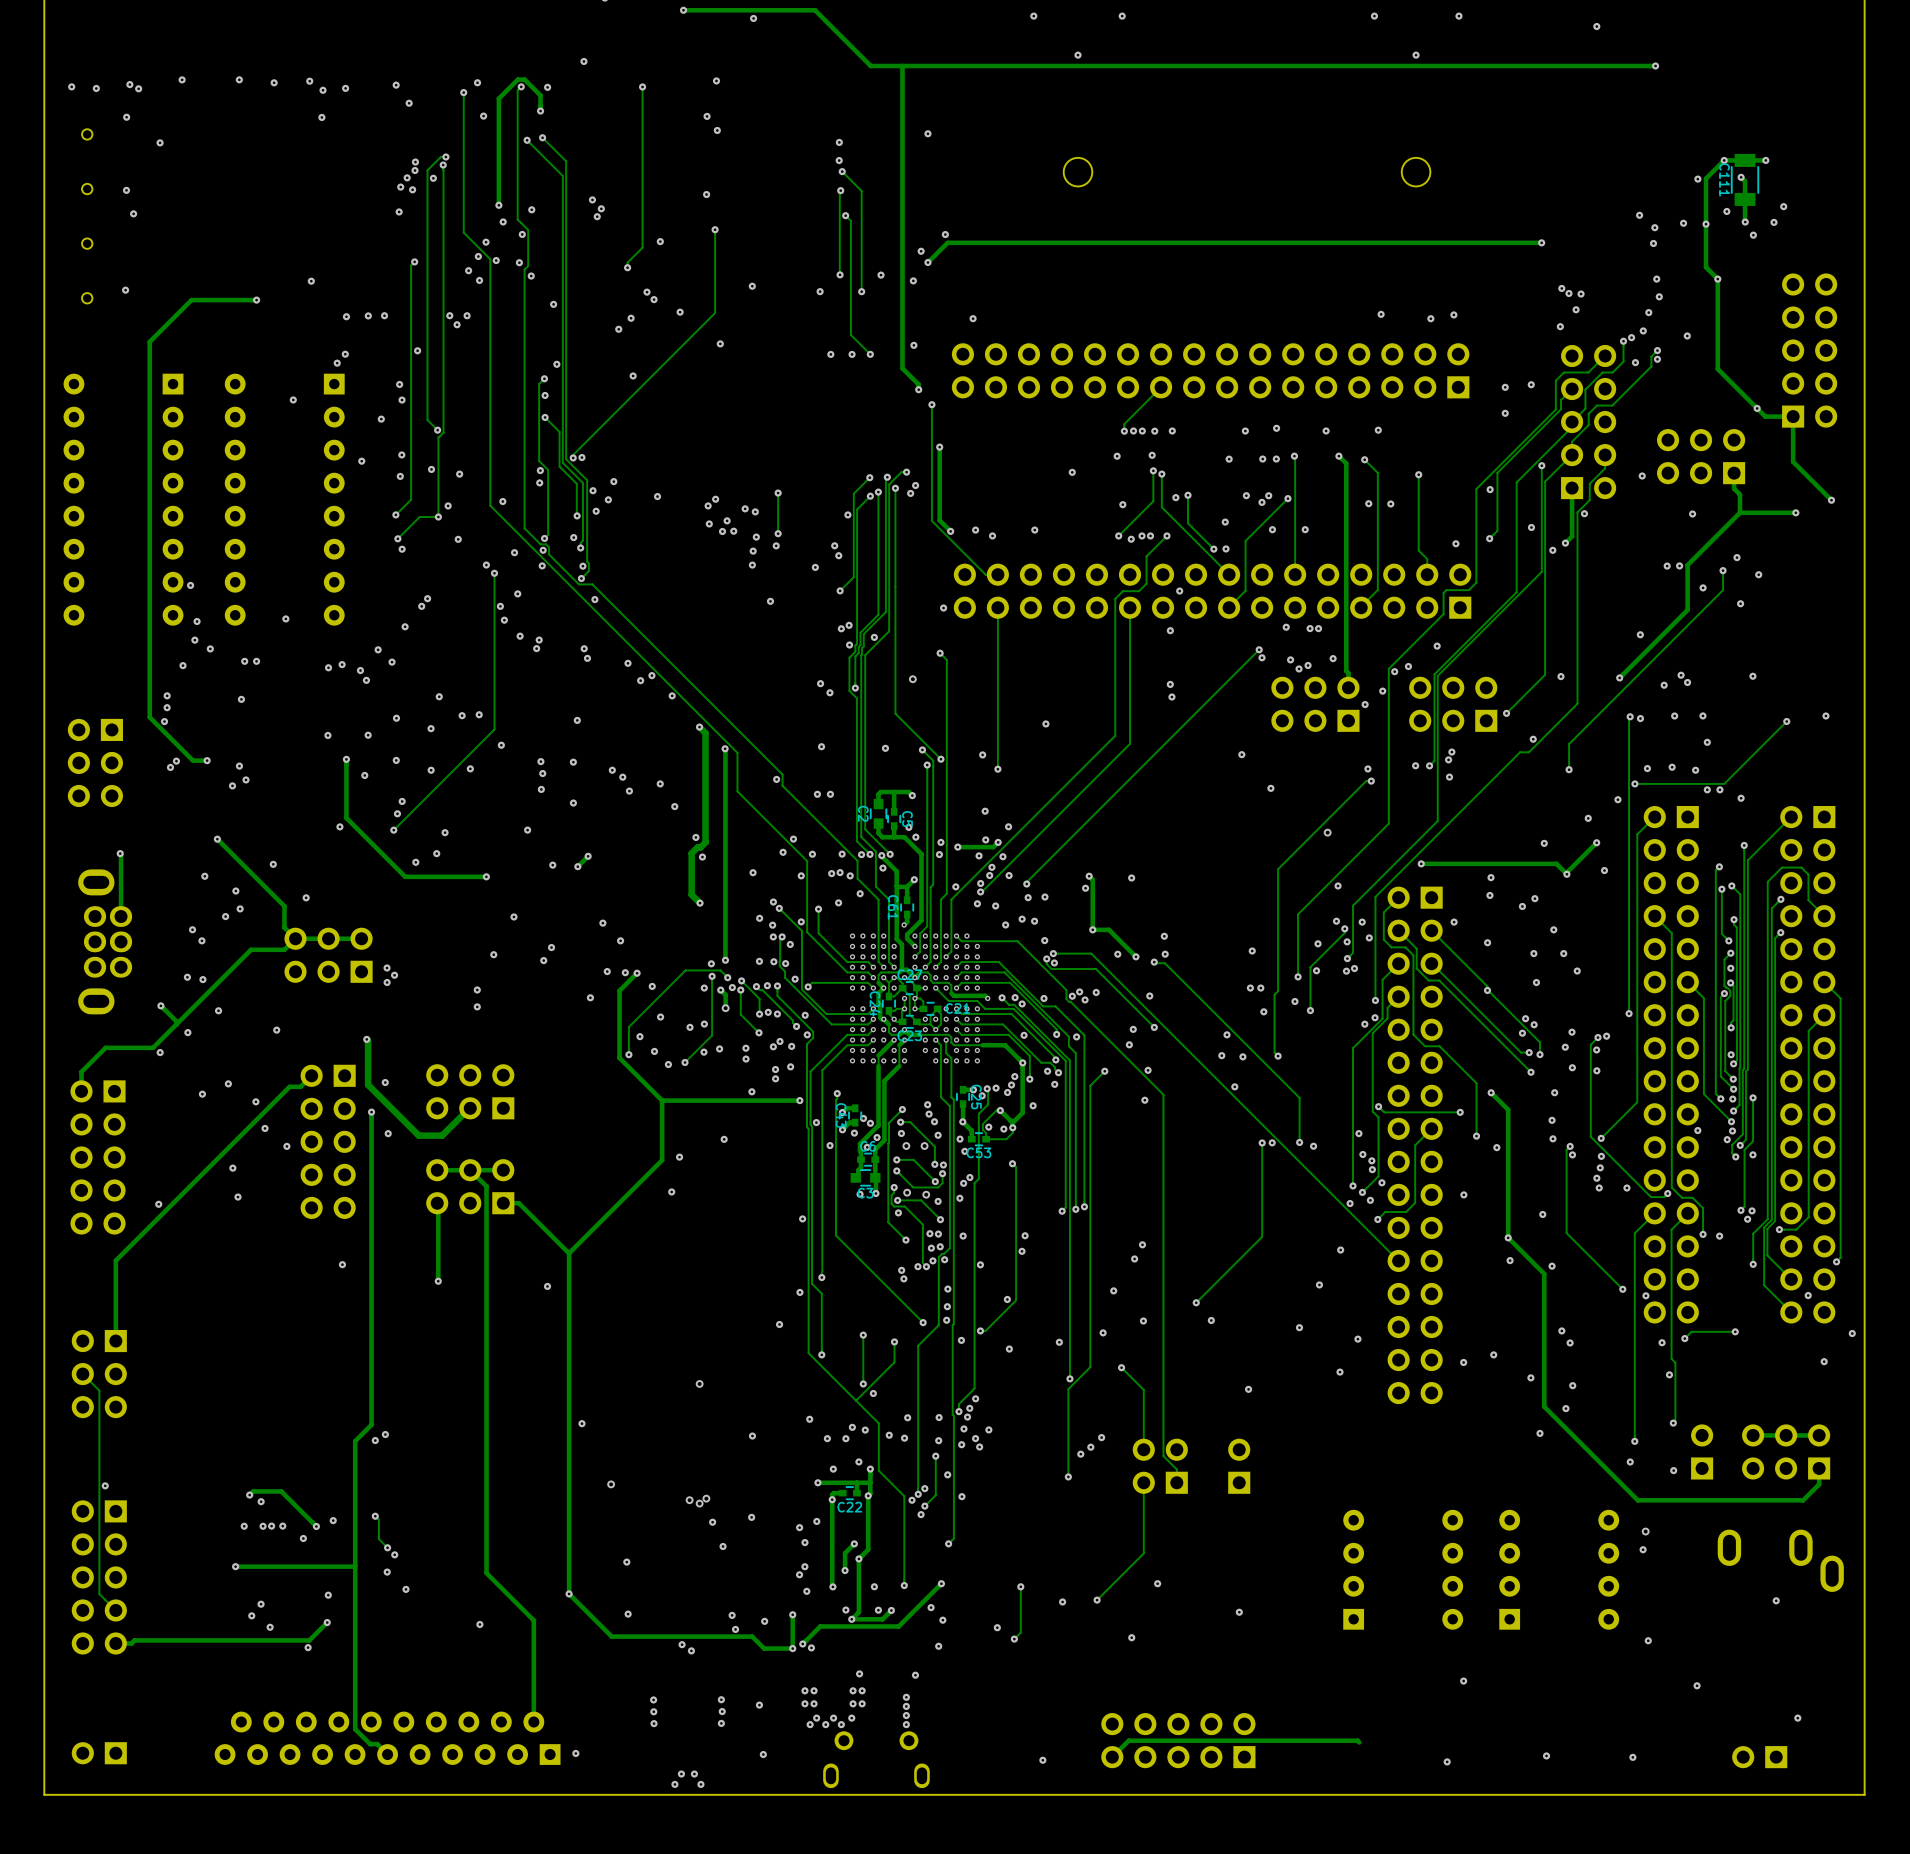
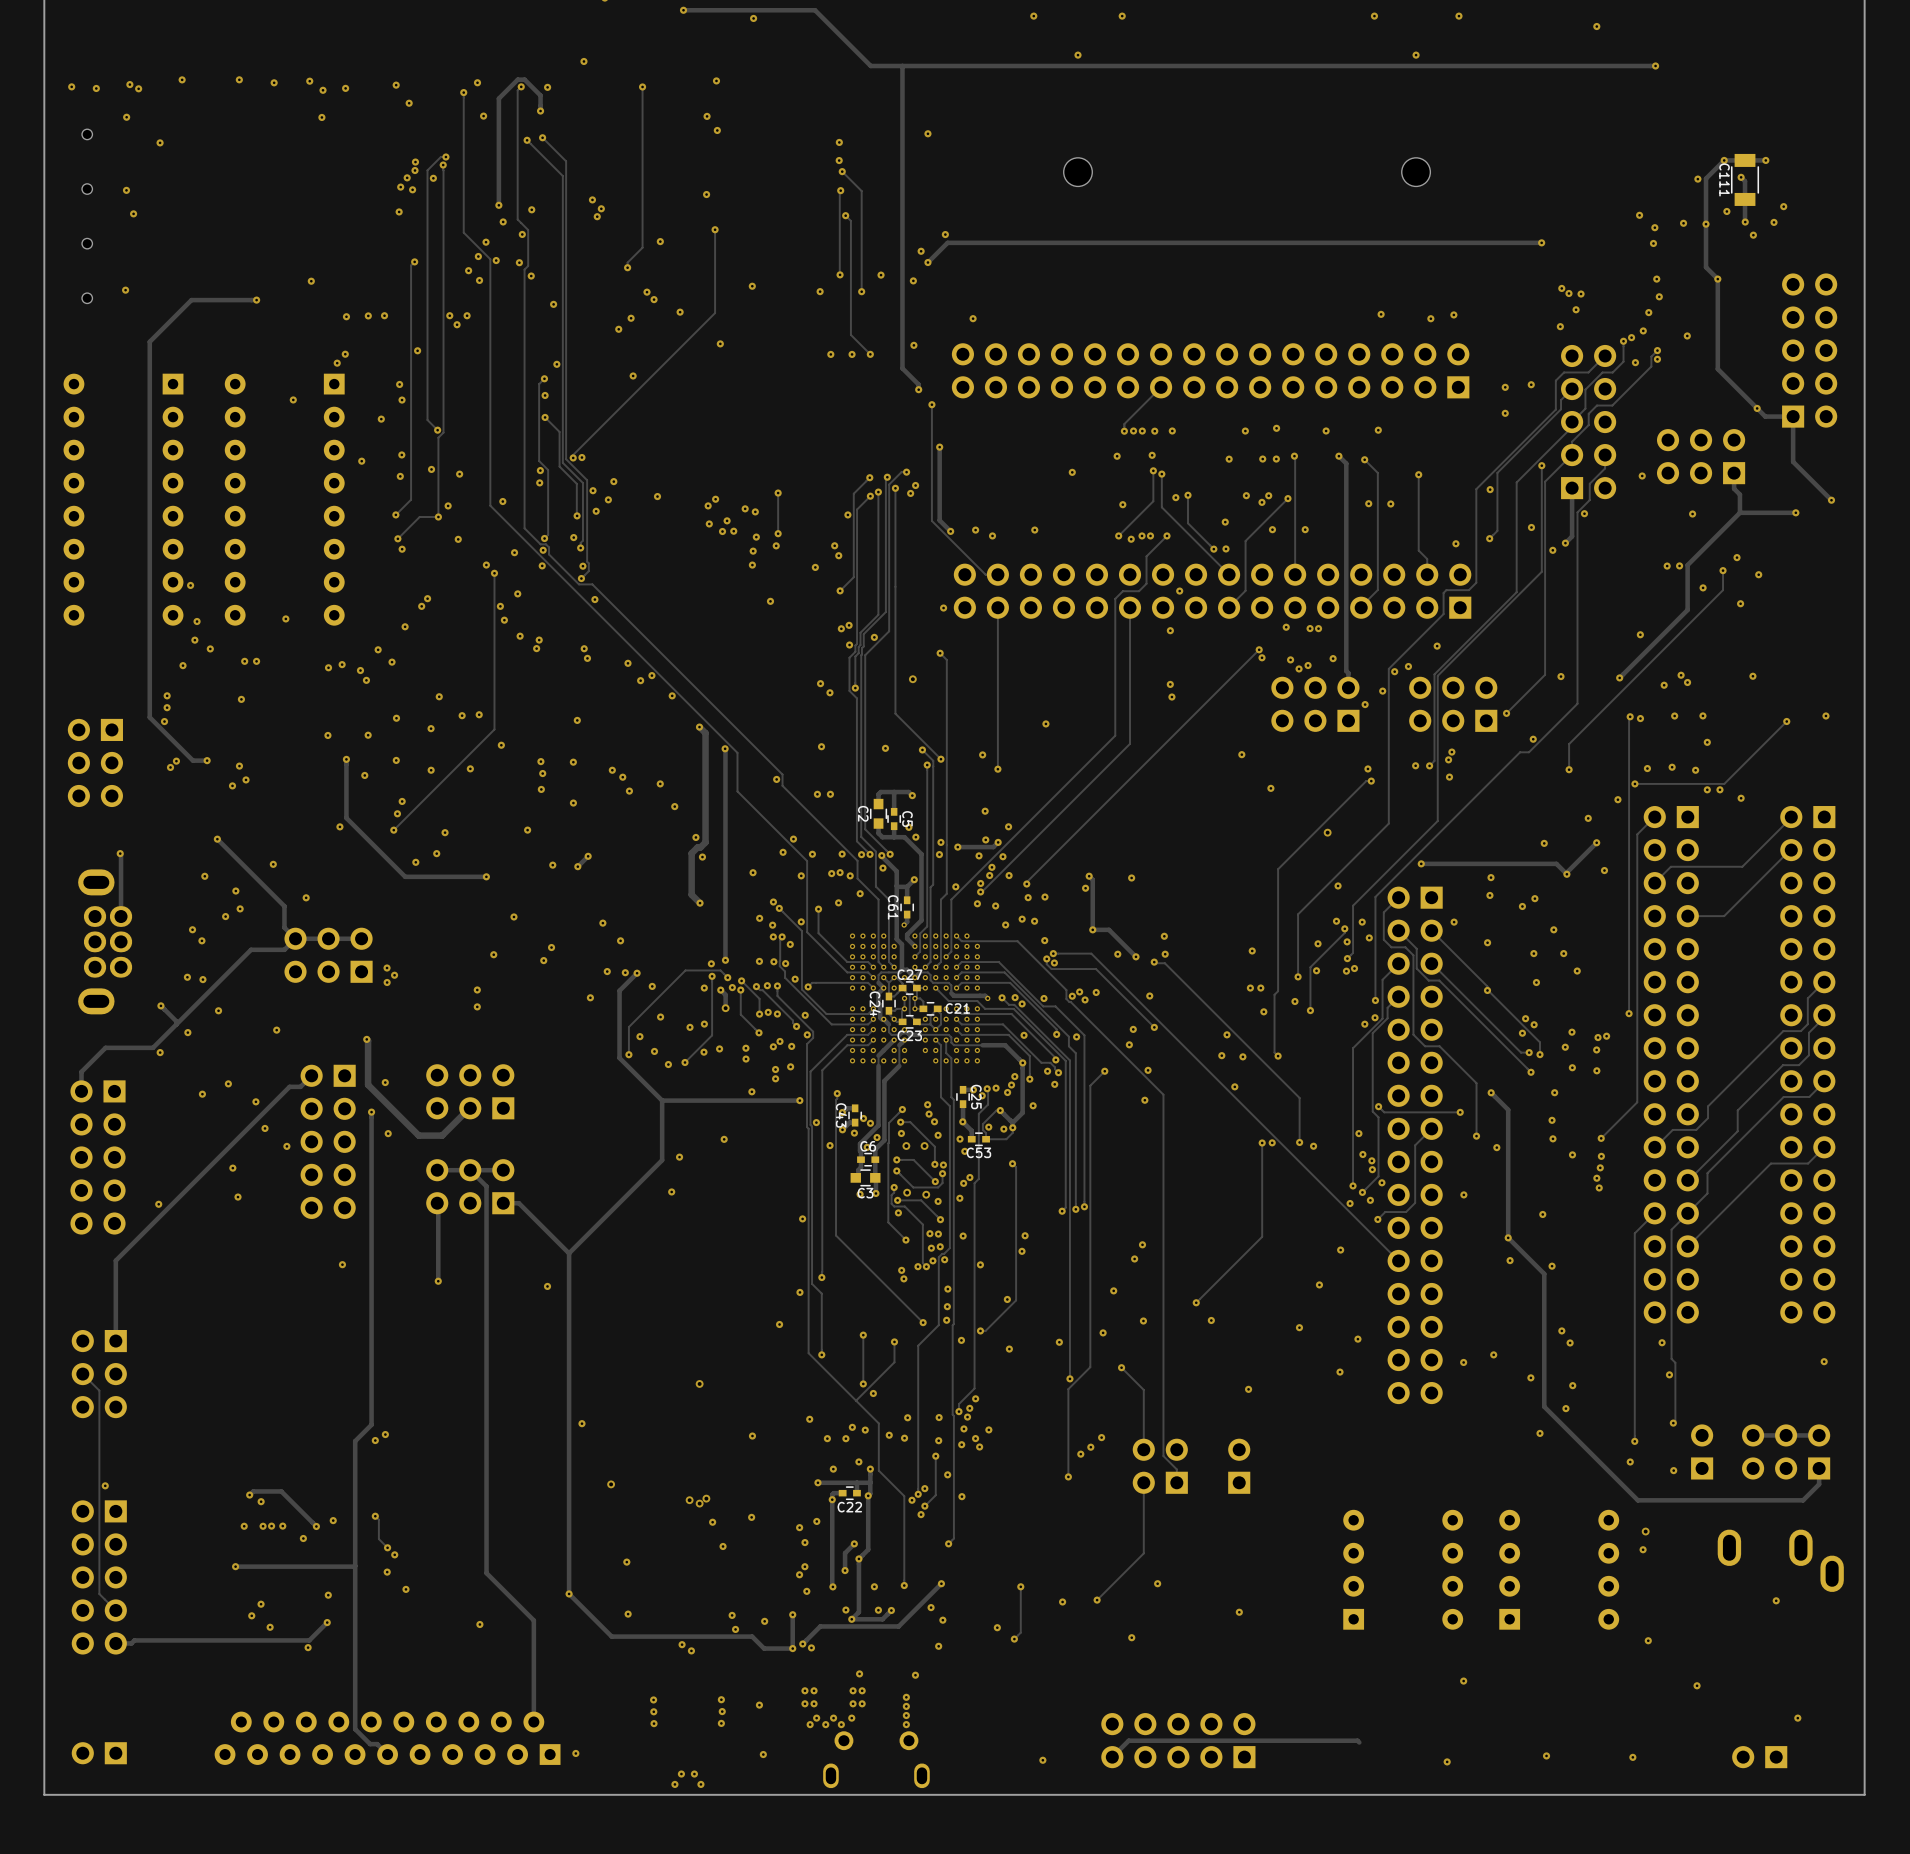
track: (1791, 817) (1747, 860) (1746, 1139) (1740, 1145) -> (1791, 817) (1742, 866) (1670, 866) (1654, 882)
track: (1744, 845) (1742, 1134) (1732, 1144) (1732, 1153) (1735, 1156) -> none
via: (1744, 845) -> none
track: none -> (1791, 850) (1724, 916) (1687, 916)
track: (1719, 866) (1715, 870) (1715, 1093) (1720, 1098) -> none
via: (1719, 866) -> none
track: (1731, 885) (1740, 894) (1739, 1105) (1733, 1111) -> none
via: (1731, 885) -> none
track: (1721, 889) (1721, 933) (1728, 940) -> none
via: (1721, 889) -> none
track: (1780, 899) (1771, 908) (1771, 1219) (1764, 1227) (1764, 1285) (1791, 1312) -> none
via: (1780, 899) -> none
track: (1654, 916) (1671, 933) (1671, 1187) (1682, 1197) (1692, 1197) (1703, 1208) (1703, 1234) -> none
track: (1824, 916) (1808, 900) (1808, 874) (1801, 867) (1781, 867) (1767, 881) (1767, 1219) (1753, 1233) (1753, 1264) -> none
track: (1734, 919) (1734, 924) (1736, 927) (1736, 1024) -> none
via: (1734, 919) -> none
track: (1780, 932) (1775, 938) (1775, 1221) (1767, 1228) (1767, 1255) (1791, 1279) -> none
via: (1780, 932) -> none
via: (1728, 940) -> none
track: (1730, 953) (1724, 959) (1724, 985) (1730, 990) (1730, 996) (1725, 1001) (1725, 1071) (1733, 1079) -> none
via: (1730, 953) -> none
via: (1730, 968) -> none
track: (1687, 982) (1703, 998) (1703, 1094) (1731, 1121) -> none
track: (1730, 982) (1733, 985) (1733, 1020) (1731, 1022) (1731, 1027) -> none
via: (1730, 982) -> none
track: (1824, 982) (1840, 998) (1840, 1257) (1836, 1261) -> (1824, 982) (1807, 998) (1807, 1024) (1800, 1031) (1783, 1031) (1708, 1106) (1708, 1118) (1696, 1129) (1672, 1129) (1654, 1147)
track: (1724, 993) (1720, 997) (1720, 1076) (1733, 1089) -> none
via: (1724, 993) -> none
track: (1824, 1015) (1808, 1030) (1808, 1217) (1796, 1229) (1779, 1229) -> (1824, 1015) (1808, 1032) (1808, 1055) (1799, 1065) (1783, 1065) (1737, 1110) (1737, 1131) (1687, 1180)
track: (1736, 1025) (1736, 1060) (1733, 1063) -> none
via: (1731, 1027) -> none
track: (1598, 1037) (1590, 1044) (1590, 1136) (1651, 1197) (1664, 1197) (1667, 1193) -> none
via: (1731, 1054) -> none
via: (1733, 1063) -> none
via: (1733, 1079) -> none
track: none -> (1824, 1081) (1809, 1096) (1783, 1096) (1707, 1173) (1707, 1193) (1687, 1213)
via: (1733, 1089) -> none
track: (1753, 1097) (1753, 1141) (1744, 1149) (1744, 1206) (1740, 1210) -> none
via: (1753, 1097) -> none
via: (1720, 1098) -> none
via: (1732, 1099) -> none
via: (1733, 1111) -> none
via: (1731, 1121) -> none
via: (1697, 1130) -> none
via: (1732, 1131) -> none
via: (1727, 1139) -> none
via: (1740, 1145) -> none
track: (1570, 1146) (1566, 1150) (1566, 1233) (1622, 1289) -> none
via: (1570, 1146) -> none
track: none -> (1824, 1147) (1808, 1163) (1770, 1163) (1687, 1246)
via: (1752, 1154) -> none
via: (1735, 1156) -> none
via: (1626, 1188) -> none
via: (1667, 1193) -> none
via: (1740, 1210) -> none
via: (1752, 1210) -> none
via: (1747, 1219) -> none
via: (1779, 1229) -> none
via: (1703, 1234) -> none
via: (1719, 1236) -> none
via: (1836, 1261) -> none
via: (1753, 1264) -> none
via: (1622, 1289) -> none
via: (1645, 1295) -> none
via: (1808, 1295) -> none
track: (1735, 1331) (1691, 1331) (1684, 1338) -> none
via: (1735, 1331) -> none
via: (1852, 1333) -> none
via: (1684, 1338) -> none

